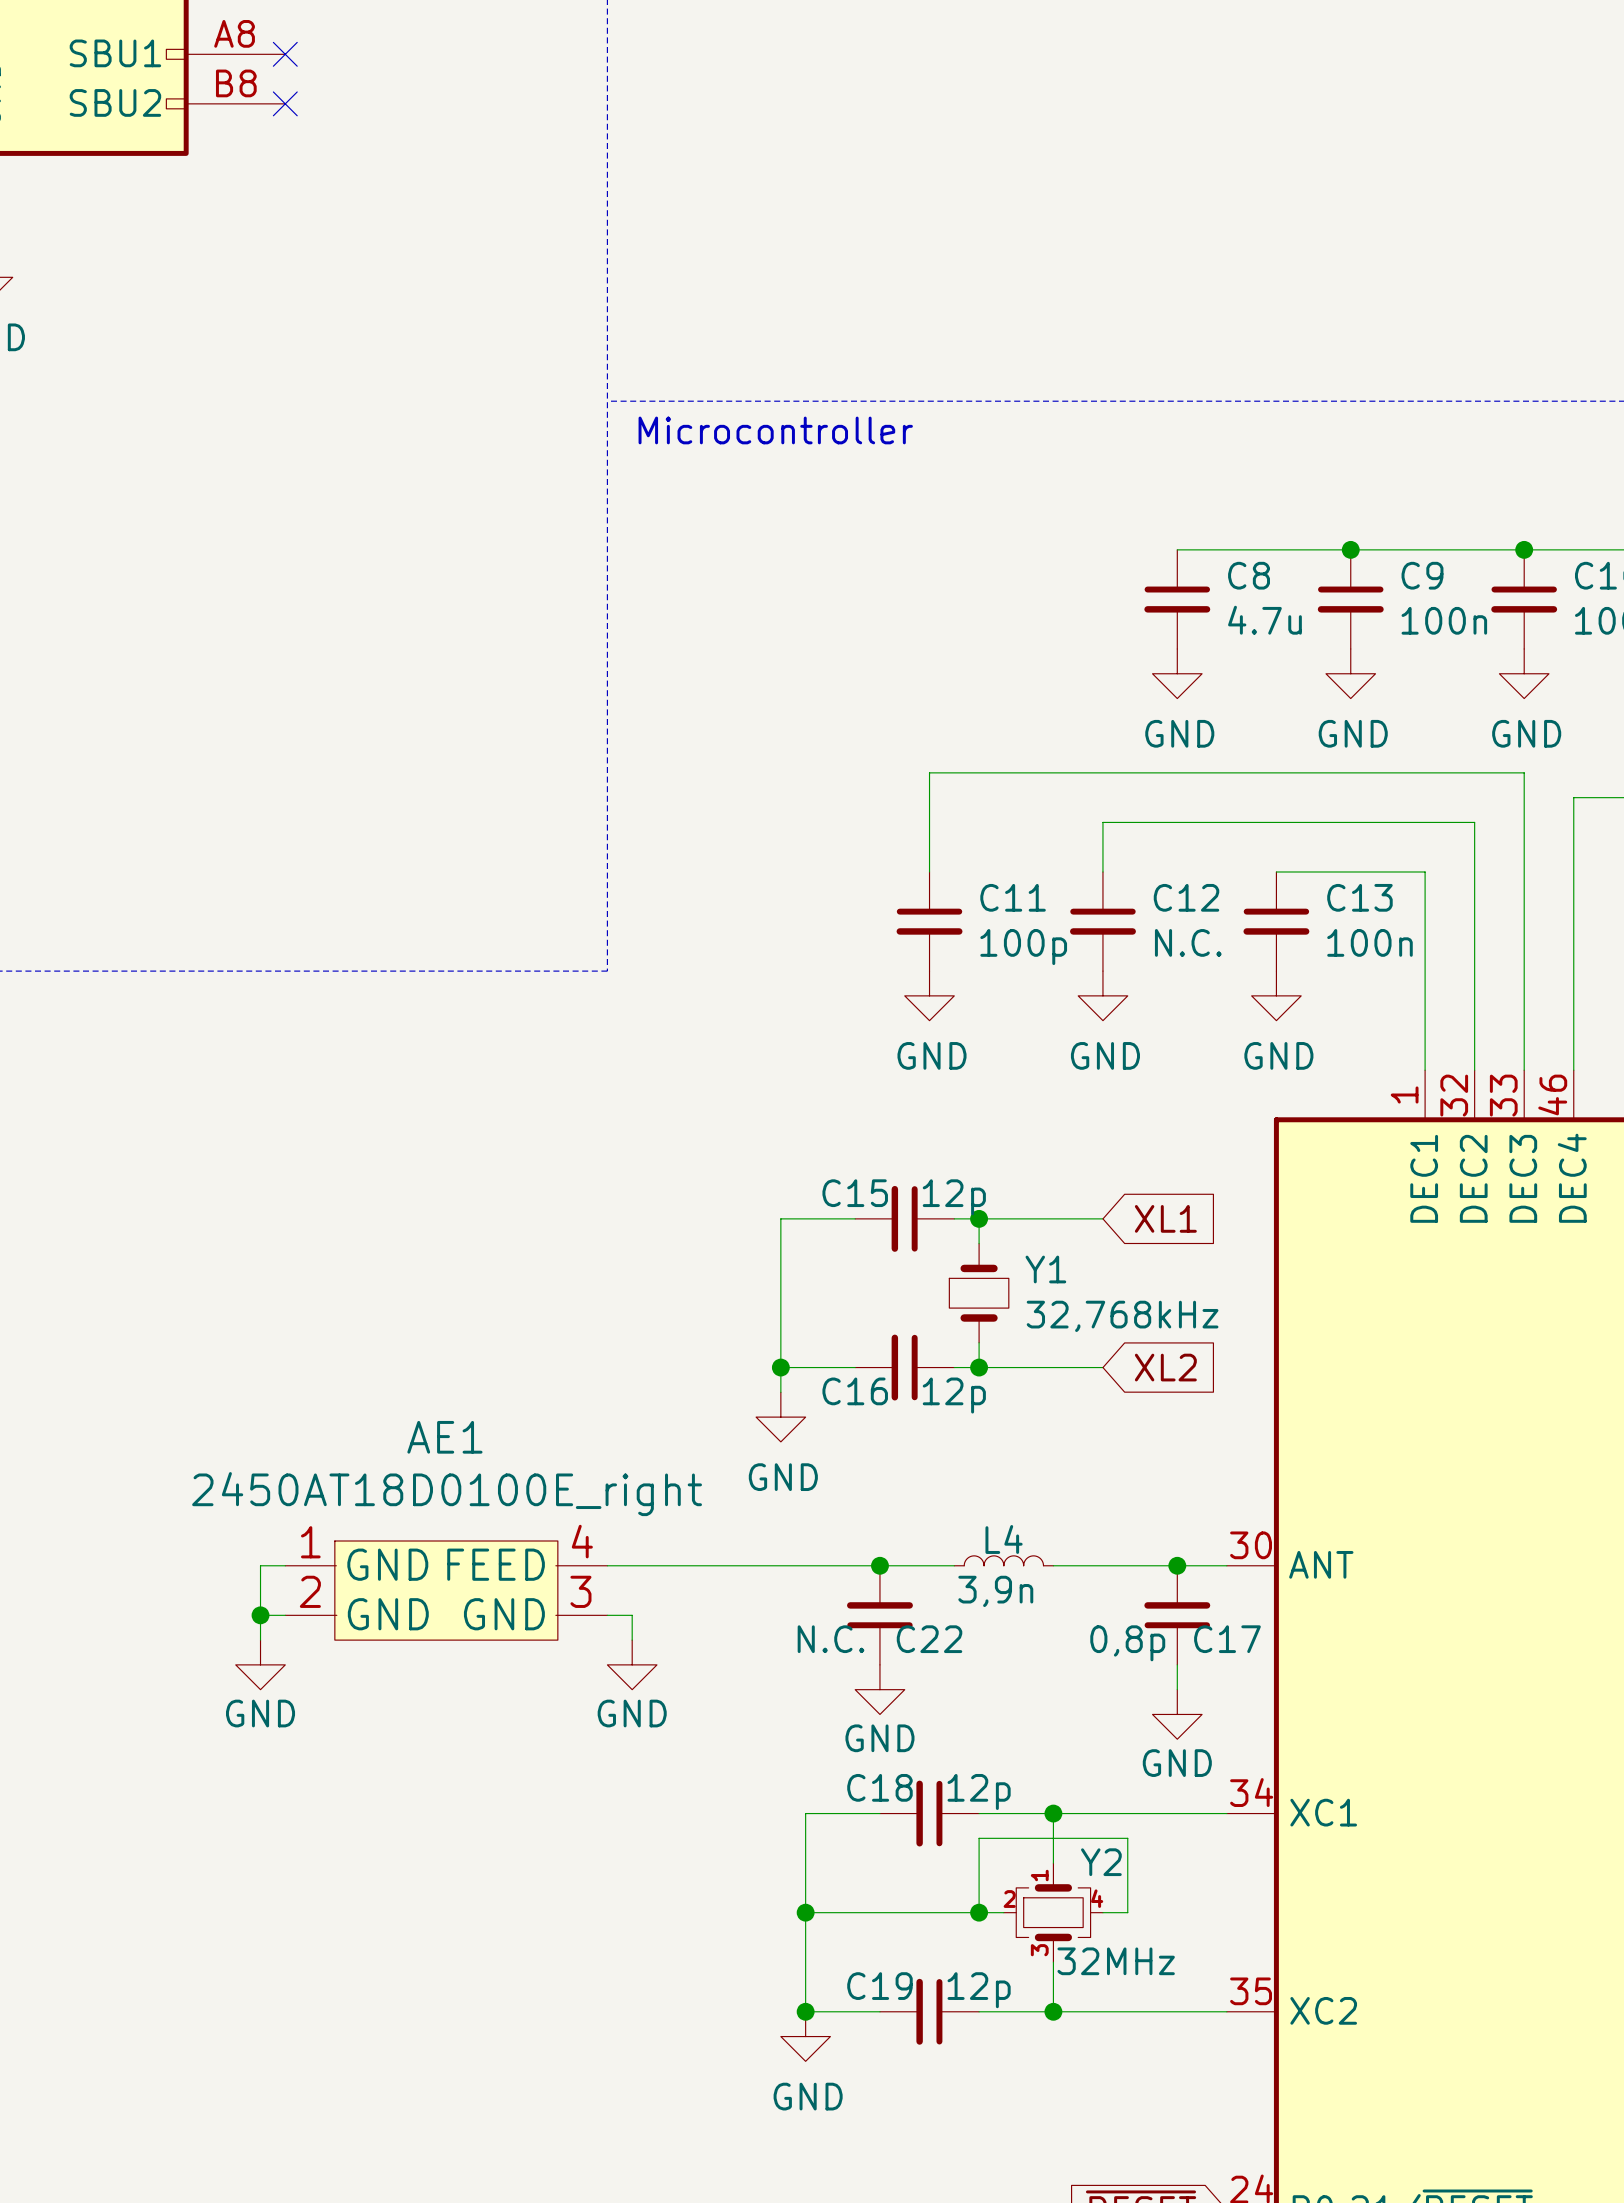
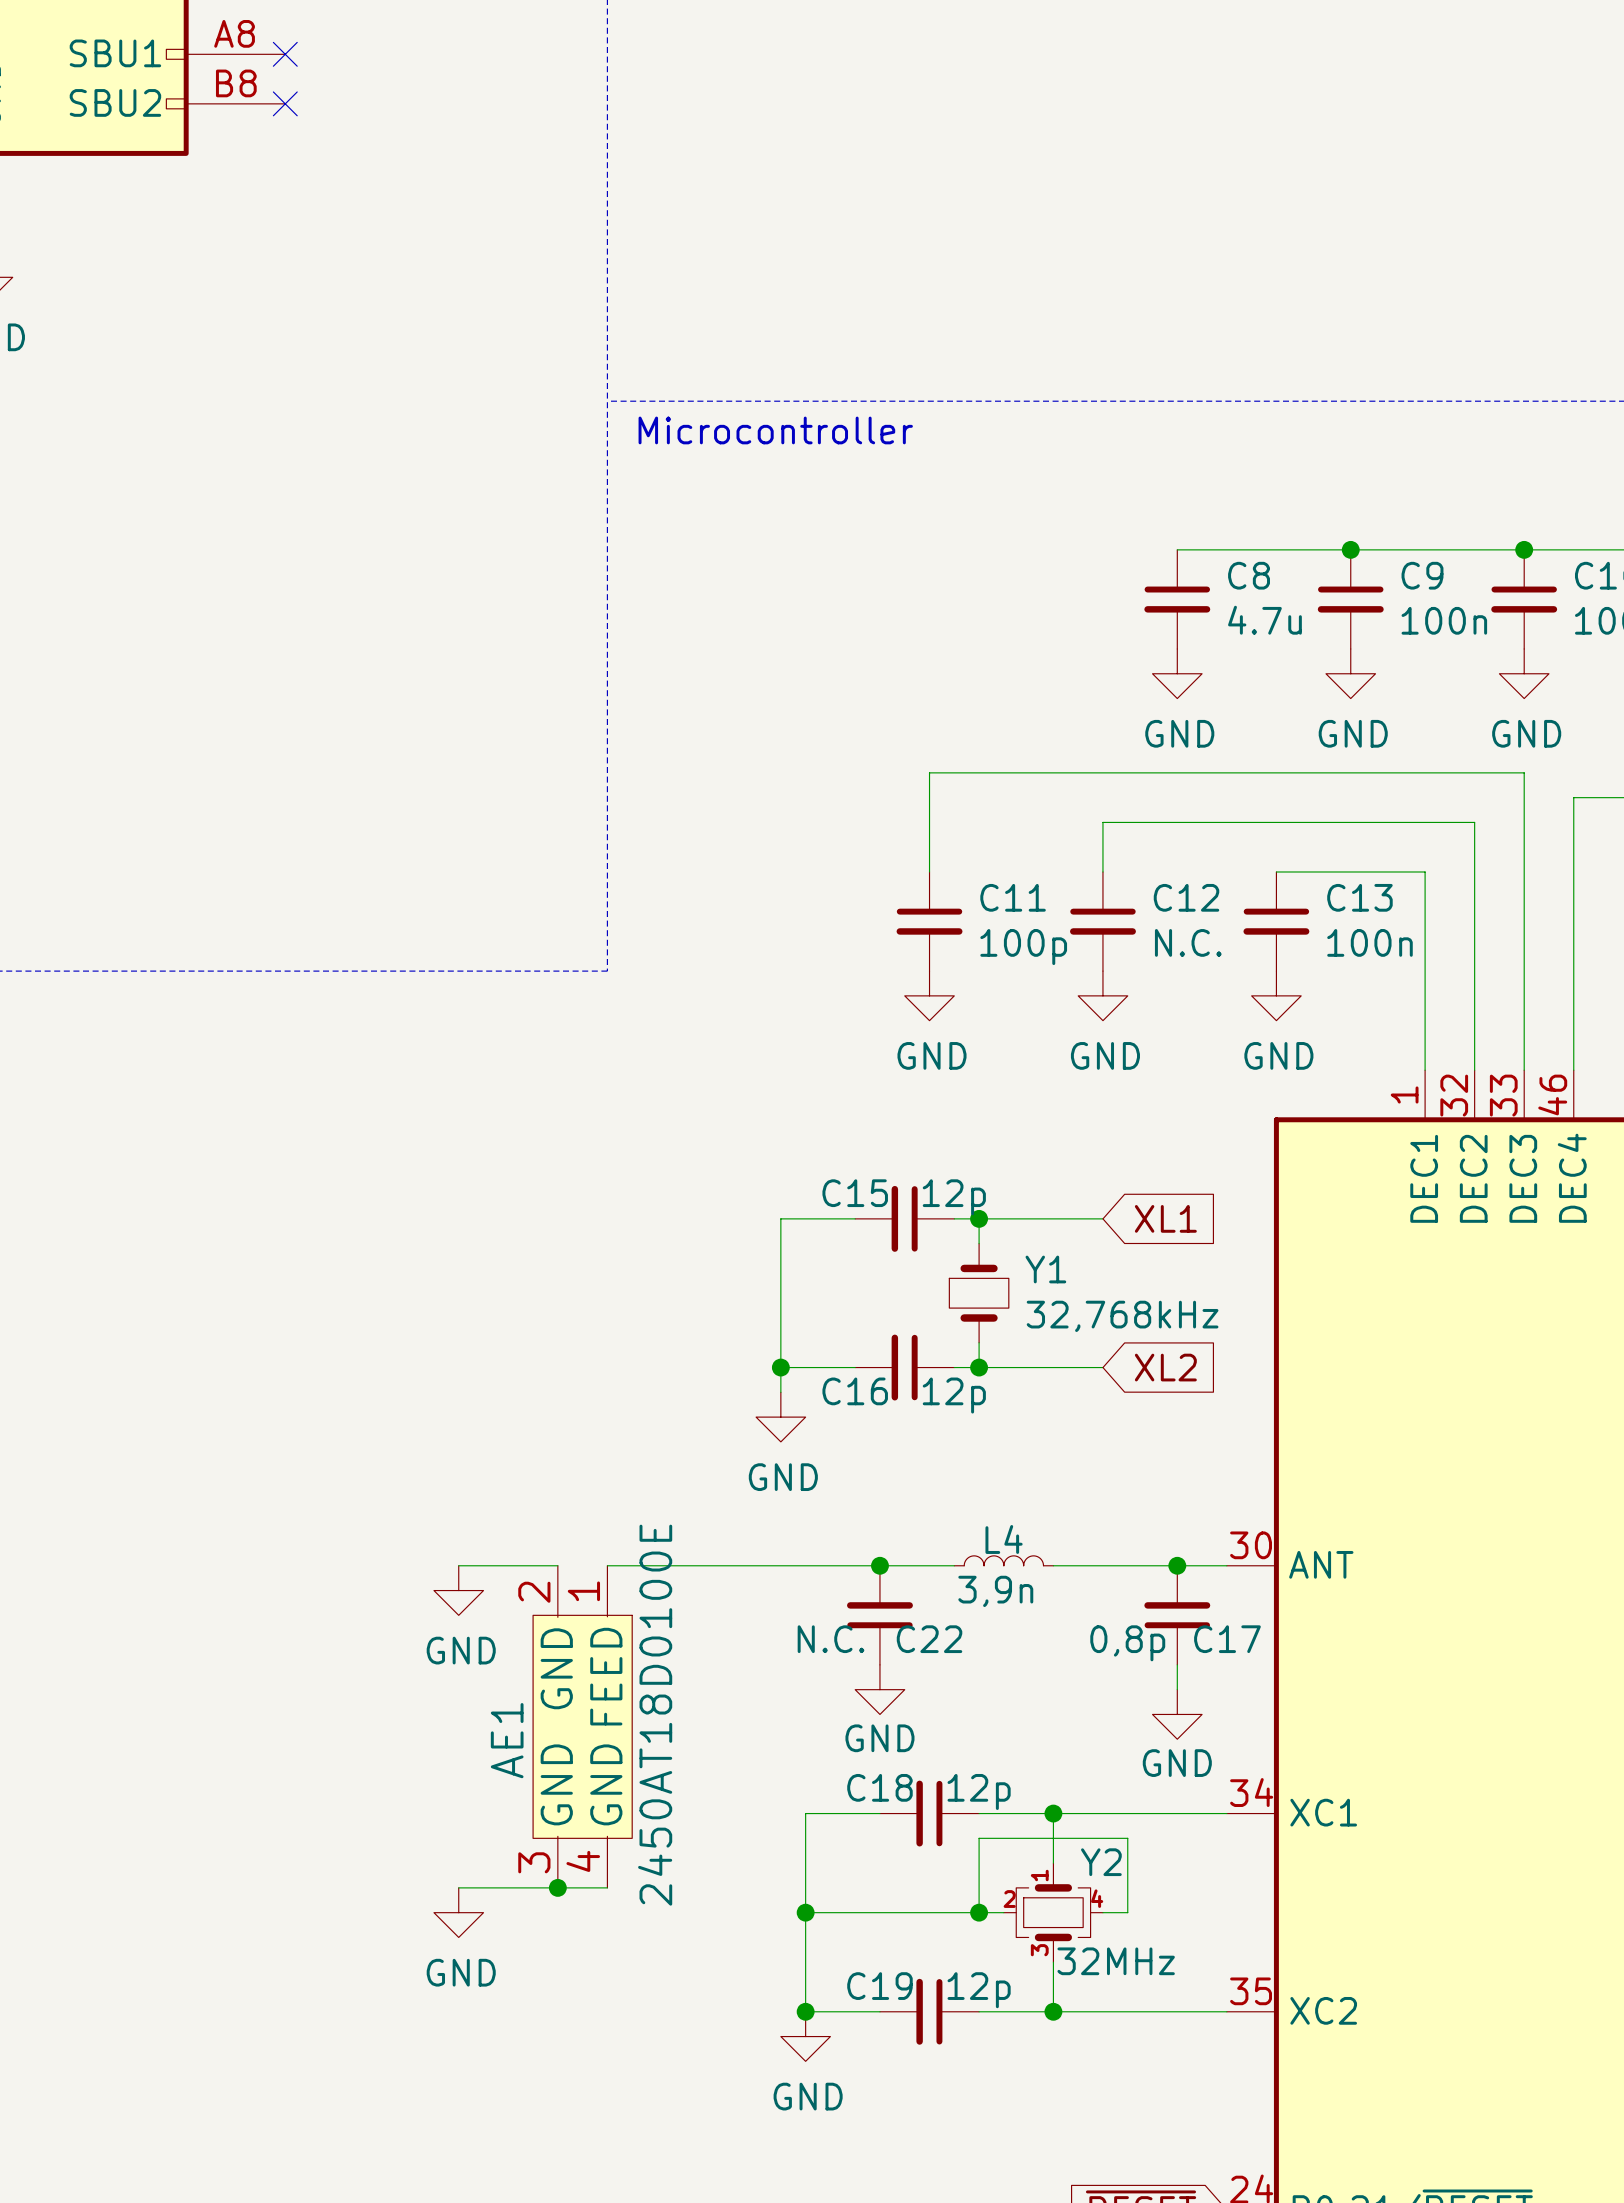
AE1 name position: AE1 (444, 1437) -> AE1 (507, 1740)
AE1 value: 2450AT18D0100E_right (447, 1494) -> 2450AT18D0100E (655, 1715)
AE1 symbol: [285, 1541, 608, 1641] -> [533, 1565, 633, 1888]
wire: (285, 1565) (260, 1565) (260, 1640) -> none
power symbol: none -> GND (458, 1590)
wire: (260, 1615) (285, 1615) -> none
junction: (260, 1615) -> none
power symbol: GND (260, 1664) -> none
power symbol: GND (632, 1664) -> none
wire: none -> (458, 1887) (607, 1887)
junction: none -> (557, 1887)
power symbol: none -> GND (458, 1912)

